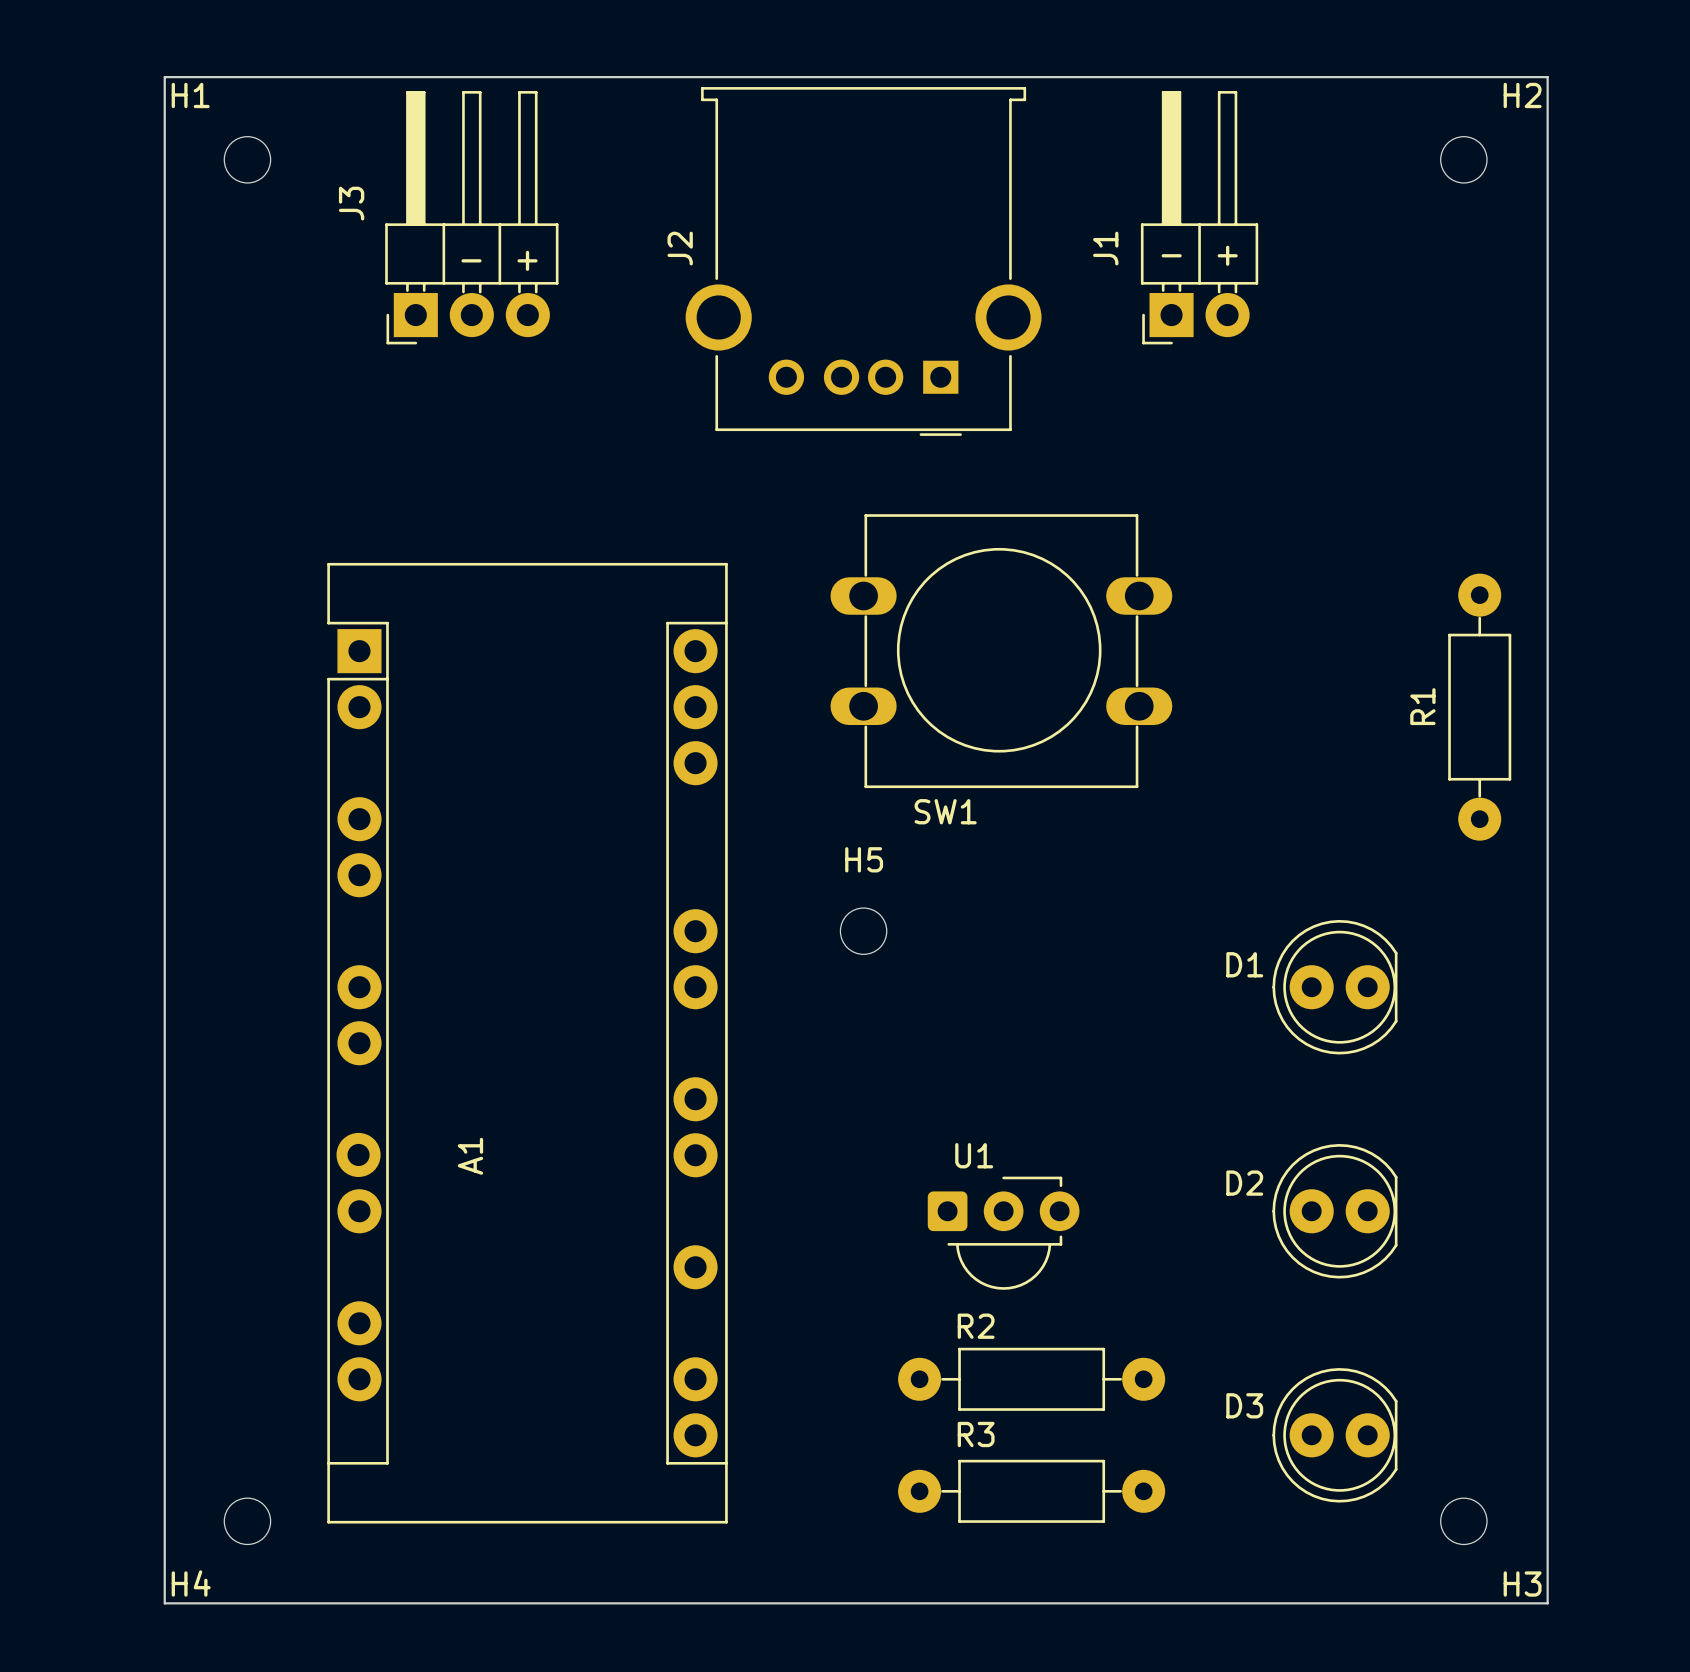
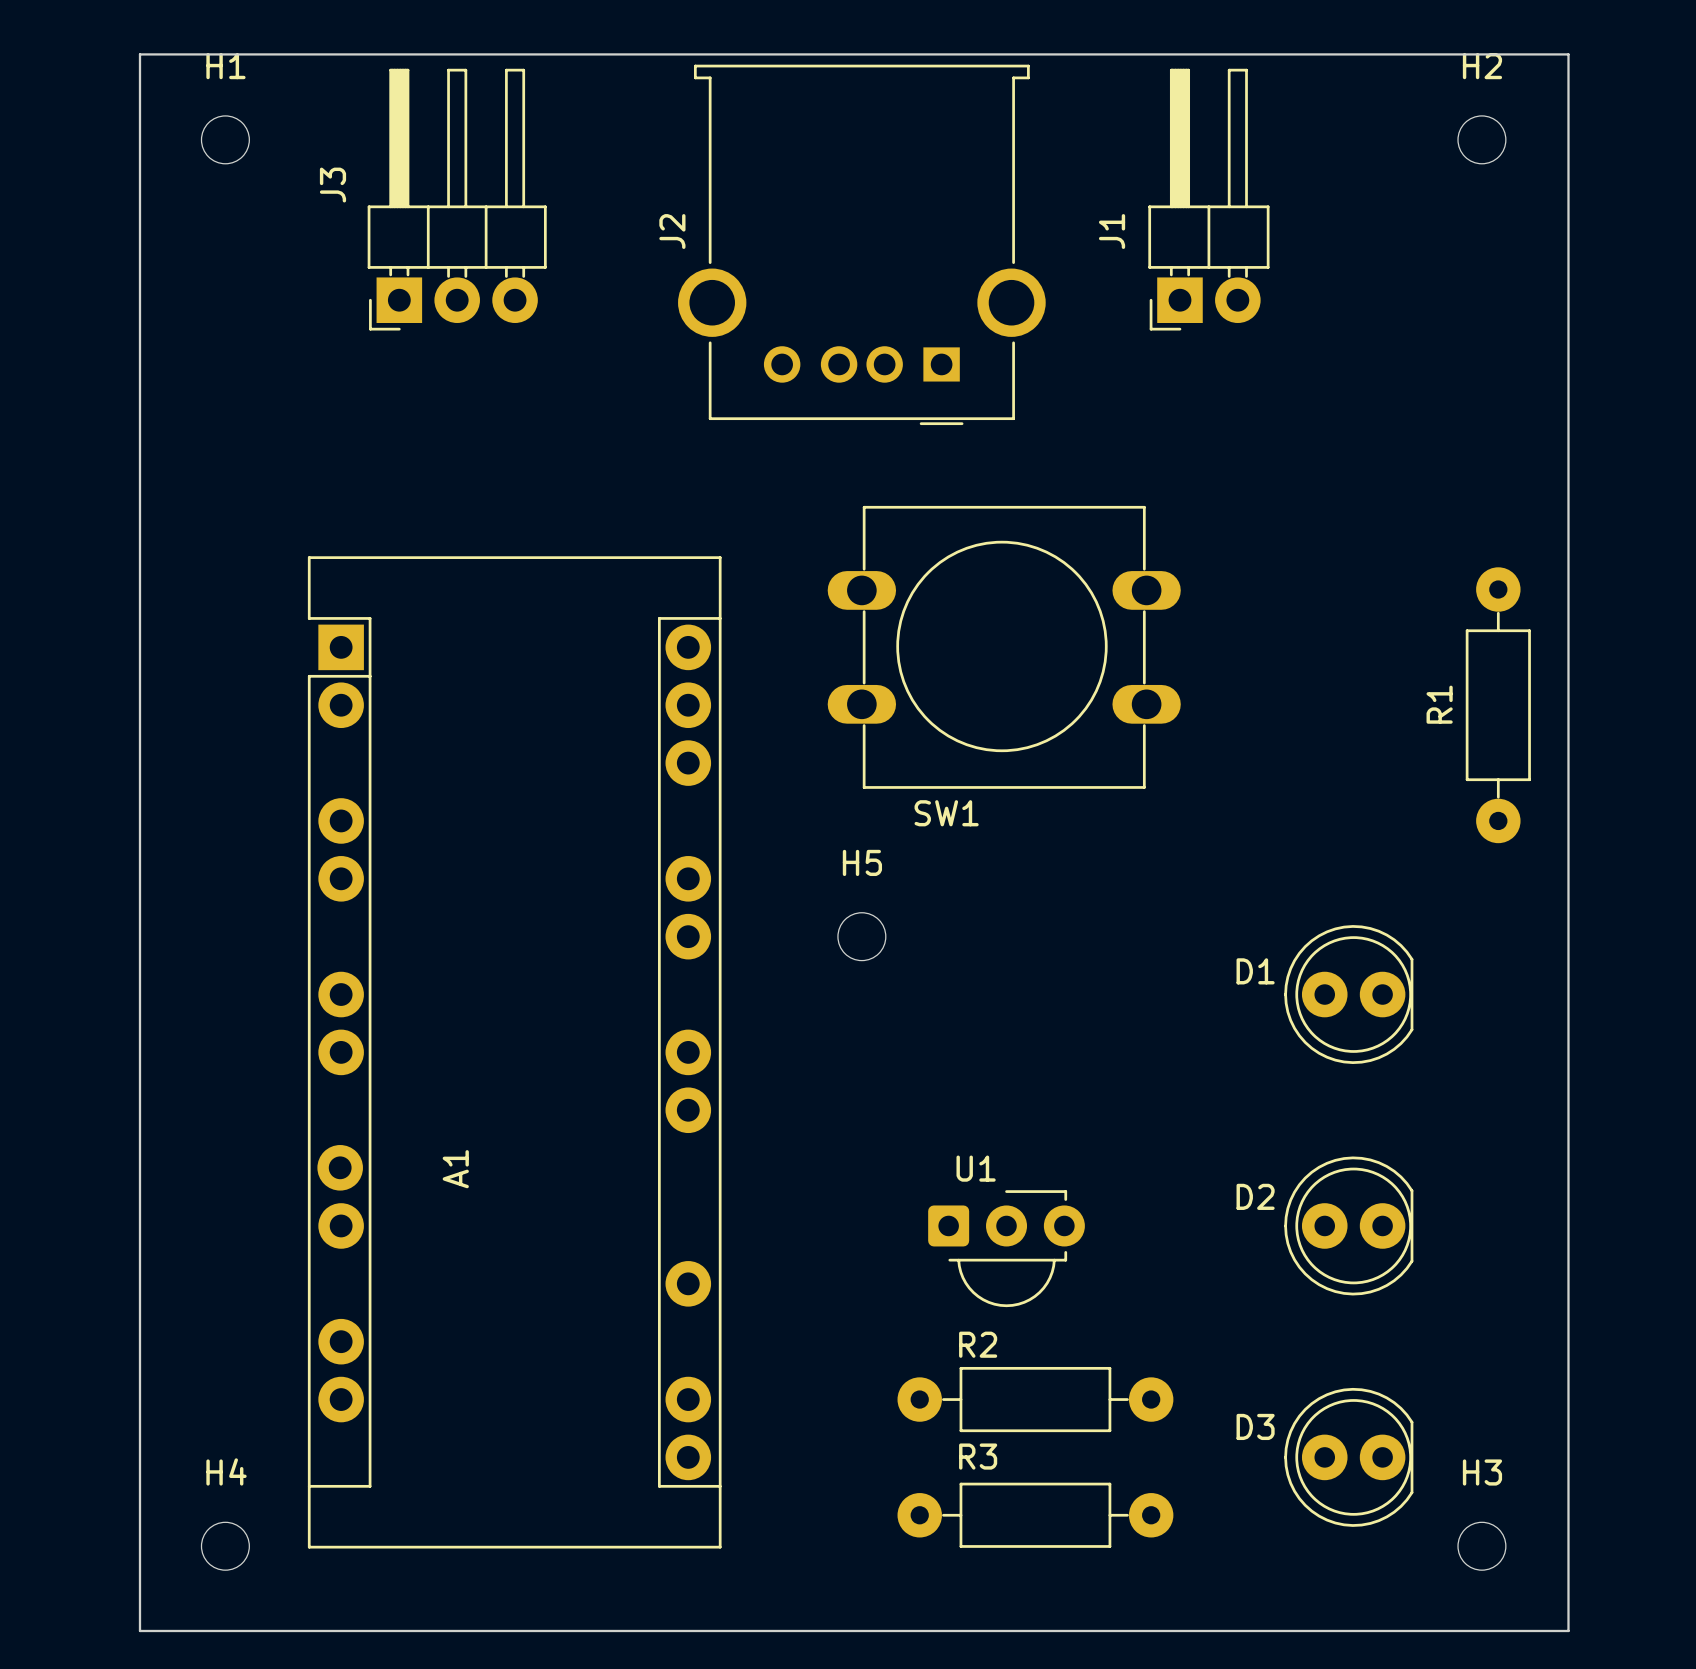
H1 name position: H1 (190, 95) -> H1 (225, 66)
H2 name position: H2 (1522, 95) -> H2 (1482, 66)
text: - (1171, 255) -> none
text: + (1227, 255) -> none
text: - (471, 260) -> none
text: + (527, 260) -> none
A1 footprint: [327, 562, 728, 1524] -> [307, 556, 722, 1549]
H4 name position: H4 (191, 1583) -> H4 (226, 1471)
H3 name position: H3 (1522, 1584) -> H3 (1482, 1472)

